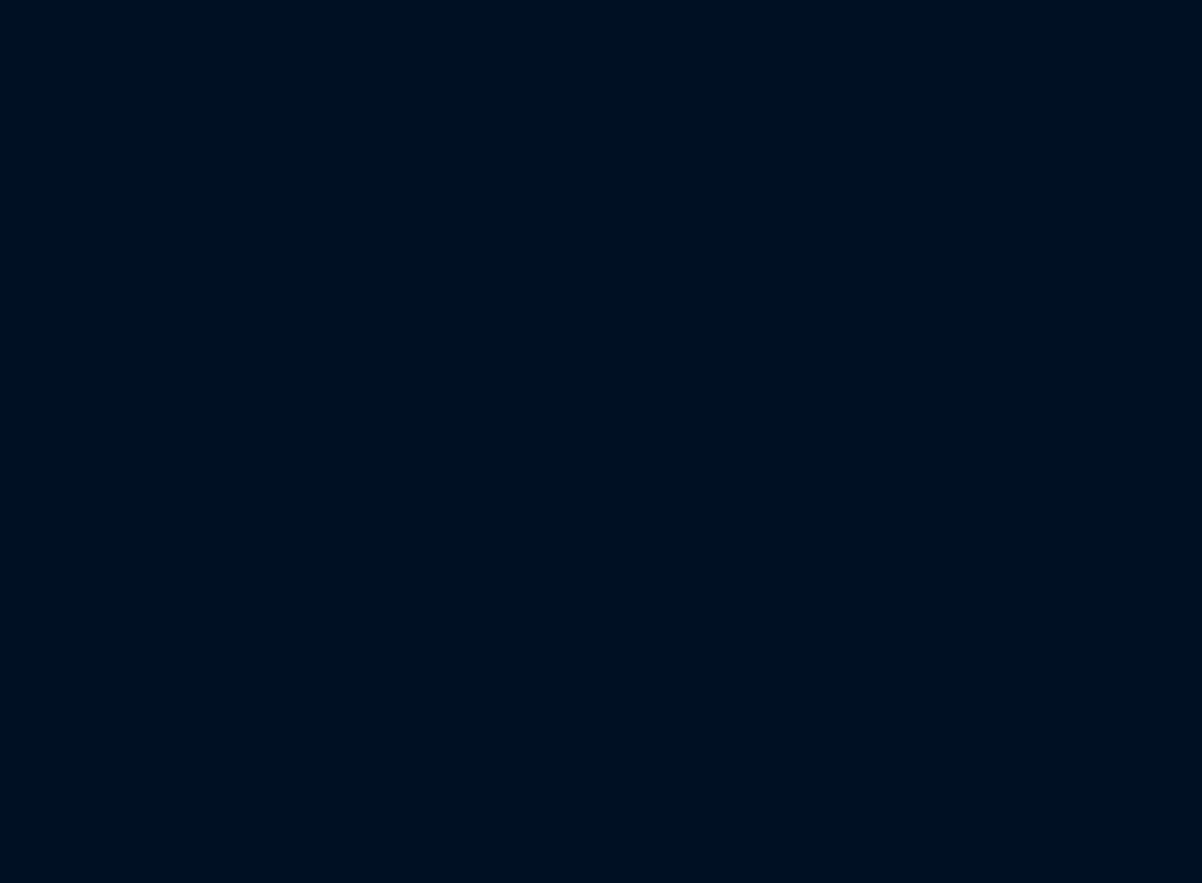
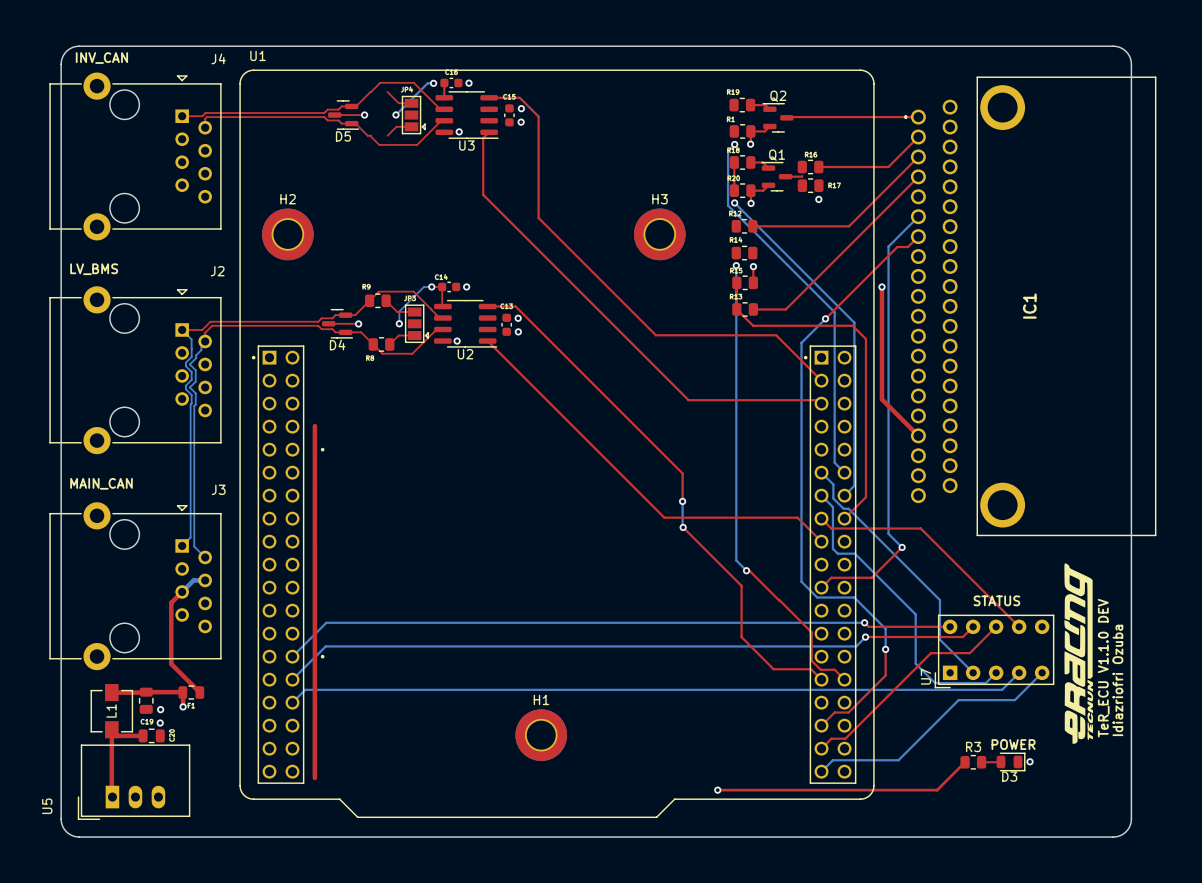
board edge: none -> (79, 46) (1113, 46) (1124, 50) (1129, 56) (1131, 64) (1131, 818) (1127, 830) (1121, 835) (1113, 837) (79, 837) (67, 833) (62, 826) (61, 818) (61, 64) (66, 51) (79, 46)
text: none -> INV_CAN (101, 58)
part: none -> (451, 82)
bottom track: none -> (433, 83) (427, 83) (396, 114)
via: none -> (433, 83)
top track: none -> (444, 83) (444, 97)
via: none -> (468, 83)
top track: none -> (387, 92) (398, 103) (411, 103)
top track: none -> (489, 97) (519, 97) (538, 116) (538, 218) (655, 335) (776, 335) (821, 380)
part: none -> (742, 105)
top track: none -> (750, 105) (765, 105) (769, 109)
via: none -> (521, 108)
top track: none -> (444, 109) (440, 109) (413, 82) (380, 82) (356, 106) (341, 106) (338, 109) (327, 109) (324, 113) (205, 113) (202, 116) (182, 116)
via: none -> (396, 114)
top track: none -> (334, 115) (364, 115)
D5: none -> (343, 115)
via: none -> (364, 115)
part: none -> (413, 115)
U3: none -> (467, 115)
part: none -> (509, 115)
Q2: none -> (778, 117)
top track: none -> (918, 117) (786, 117)
top track: none -> (444, 120) (441, 120) (417, 144) (379, 144) (355, 123) (341, 123) (338, 120) (327, 120) (324, 117) (207, 117) (205, 119) (205, 127)
via: none -> (521, 122)
top track: none -> (411, 126) (396, 126) (387, 135)
top track: none -> (769, 126) (764, 131) (750, 131) (750, 144)
via: none -> (459, 131)
part: none -> (742, 131)
top track: none -> (489, 132) (483, 138) (483, 194) (688, 400) (818, 400) (821, 403)
top track: none -> (918, 137) (888, 167) (818, 167)
bottom track: none -> (734, 144) (728, 151) (728, 205) (834, 312) (834, 462) (844, 472)
via: none -> (734, 144)
via: none -> (750, 144)
J4: none -> (135, 156)
top track: none -> (918, 156) (849, 226) (752, 226)
top track: none -> (734, 162) (734, 190)
part: none -> (742, 162)
top track: none -> (750, 162) (762, 162) (768, 168)
part: none -> (810, 167)
Q1: none -> (776, 176)
top track: none -> (802, 176) (785, 176)
top track: none -> (918, 176) (785, 309) (753, 309)
top track: none -> (768, 185) (763, 190) (750, 190) (751, 203)
part: none -> (810, 185)
part: none -> (742, 190)
via: none -> (818, 199)
bottom track: none -> (734, 202) (854, 322) (854, 485) (844, 495)
via: none -> (734, 202)
via: none -> (751, 203)
bottom track: none -> (918, 216) (888, 246) (888, 533) (902, 547)
part: none -> (744, 226)
H2: none -> (287, 234)
H3: none -> (659, 234)
top track: none -> (918, 236) (908, 247) (897, 247) (825, 318)
part: none -> (744, 253)
bottom track: none -> (736, 265) (736, 560) (746, 570)
via: none -> (736, 265)
top track: none -> (753, 266) (753, 282)
via: none -> (753, 266)
text: none -> LV_BMS (94, 269)
top track: none -> (736, 282) (736, 309) (753, 325) (852, 325) (865, 339) (865, 497) (844, 518)
part: none -> (745, 282)
top track: none -> (431, 286) (442, 286) (442, 306)
bottom track: none -> (431, 286) (423, 286) (399, 311) (399, 323)
via: none -> (431, 286)
part: none -> (449, 286)
via: none -> (466, 286)
top track: none -> (881, 287) (881, 399) (918, 435)
via: none -> (881, 287)
part: none -> (377, 300)
top track: none -> (386, 300) (397, 312) (414, 312)
top track: none -> (487, 306) (515, 306) (682, 473) (682, 501)
IC1: none -> (1030, 306)
part: none -> (745, 309)
top track: none -> (442, 318) (439, 318) (413, 291) (378, 291) (355, 315) (335, 315) (332, 318) (321, 318) (318, 321) (210, 321) (202, 329) (182, 329)
via: none -> (518, 318)
bottom track: none -> (825, 318) (801, 342) (801, 581) (817, 597) (854, 597) (885, 628) (885, 649)
via: none -> (825, 318)
top track: none -> (328, 323) (358, 323)
D4: none -> (337, 323)
via: none -> (358, 323)
via: none -> (399, 323)
part: none -> (416, 323)
U2: none -> (465, 323)
part: none -> (506, 324)
bottom track: none -> (182, 329) (191, 339) (191, 348)
top track: none -> (442, 329) (436, 329) (412, 353) (382, 353) (361, 332) (335, 332) (332, 329) (321, 329) (318, 325) (212, 325) (205, 332) (205, 341)
via: none -> (518, 331)
top track: none -> (414, 335) (398, 335) (389, 344)
bottom track: none -> (205, 341) (201, 345) (201, 349) (196, 355) (196, 358) (189, 364)
via: none -> (457, 341)
top track: none -> (487, 341) (664, 517) (797, 517) (821, 541)
part: none -> (381, 344)
bottom track: none -> (191, 349) (191, 356) (185, 362) (185, 366) (191, 372) (191, 379) (185, 385) (185, 389) (191, 395) (190, 537) (182, 545)
bottom track: none -> (189, 364) (195, 370) (195, 381) (189, 387)
J2: none -> (135, 370)
bottom track: none -> (189, 387) (195, 393) (194, 546) (205, 557)
top track: none -> (314, 426) (314, 778)
U1: none -> (557, 443)
bottom track: none -> (821, 472) (833, 484) (833, 498) (843, 508) (848, 508) (939, 600) (939, 639) (973, 672)
text: none -> MAIN_CAN (101, 483)
bottom track: none -> (821, 495) (832, 507) (832, 548) (837, 553) (854, 553) (915, 614) (915, 663) (935, 683) (985, 683) (996, 672)
bottom track: none -> (682, 501) (683, 527)
via: none -> (682, 501)
top track: none -> (821, 518) (831, 528) (920, 528) (1019, 626)
top track: none -> (683, 527) (741, 585) (741, 637) (773, 669) (811, 669) (821, 679)
via: none -> (683, 527)
top track: none -> (902, 547) (871, 577) (831, 577) (821, 587)
via: none -> (902, 547)
drawing: none -> [1064, 563, 1094, 744]
top track: none -> (746, 570) (749, 570) (811, 632) (811, 660) (820, 669) (834, 669) (844, 679)
via: none -> (746, 570)
bottom track: none -> (205, 580) (193, 580) (182, 591)
J3: none -> (135, 586)
top track: none -> (182, 591) (171, 602) (171, 663) (199, 692)
text: none -> STATUS (996, 600)
top track: none -> (864, 622) (868, 626) (950, 626)
bottom track: none -> (864, 622) (326, 622) (292, 656)
via: none -> (864, 622)
top track: none -> (973, 626) (962, 637) (865, 637)
top track: none -> (996, 626) (969, 653) (931, 653) (845, 738) (831, 738) (821, 748)
bottom track: none -> (865, 637) (856, 646) (325, 646) (292, 679)
via: none -> (865, 637)
top track: none -> (885, 649) (885, 675) (848, 712) (834, 712) (821, 725)
via: none -> (885, 649)
U7: none -> (994, 651)
text: none -> TeR_ECU V1.1.0 DEV (1103, 668)
bottom track: none -> (1019, 672) (1002, 689) (305, 689) (292, 702)
bottom track: none -> (1042, 672) (1014, 700) (958, 700) (898, 760) (832, 760) (821, 771)
text: none -> Idiazriofri Ozuba (1117, 680)
top track: none -> (111, 692) (182, 692) (183, 706)
part: none -> (191, 692)
part: none -> (146, 700)
via: none -> (183, 706)
via: none -> (160, 709)
L1: none -> (111, 711)
via: none -> (160, 723)
top track: none -> (143, 735) (117, 735) (111, 729) (112, 797)
part: none -> (151, 735)
H1: none -> (541, 735)
text: none -> POWER (1013, 744)
top track: none -> (1001, 761) (981, 762)
D3: none -> (1010, 761)
via: none -> (1029, 761)
top track: none -> (965, 762) (937, 790) (717, 790)
R3: none -> (973, 762)
U5: none -> (134, 782)
via: none -> (717, 790)

